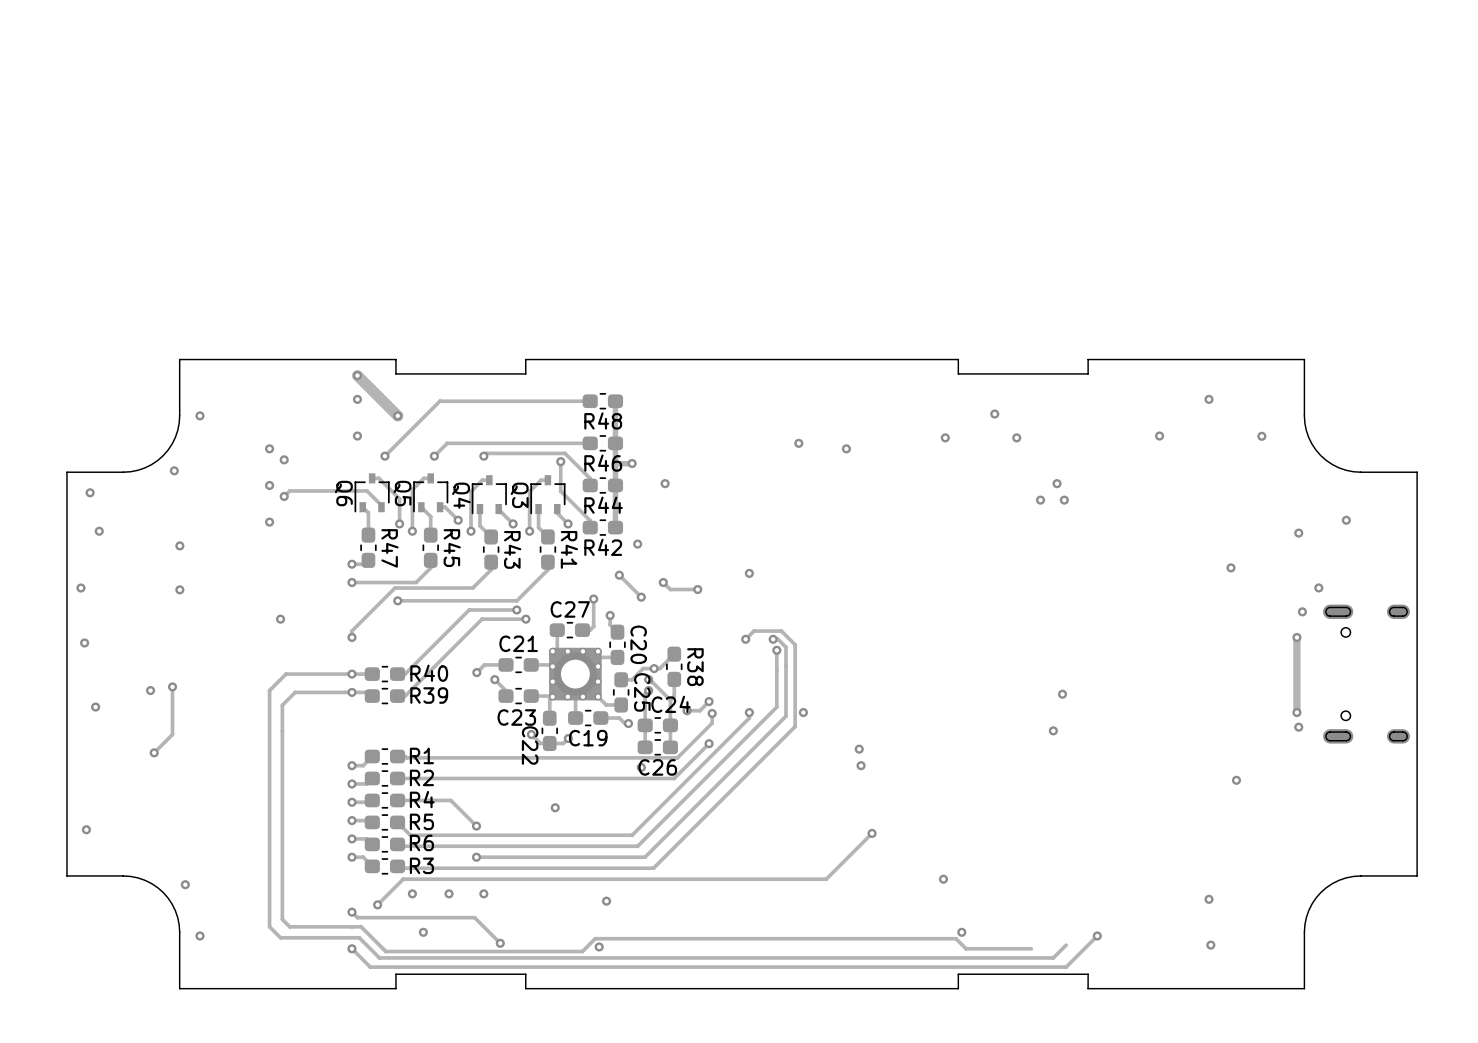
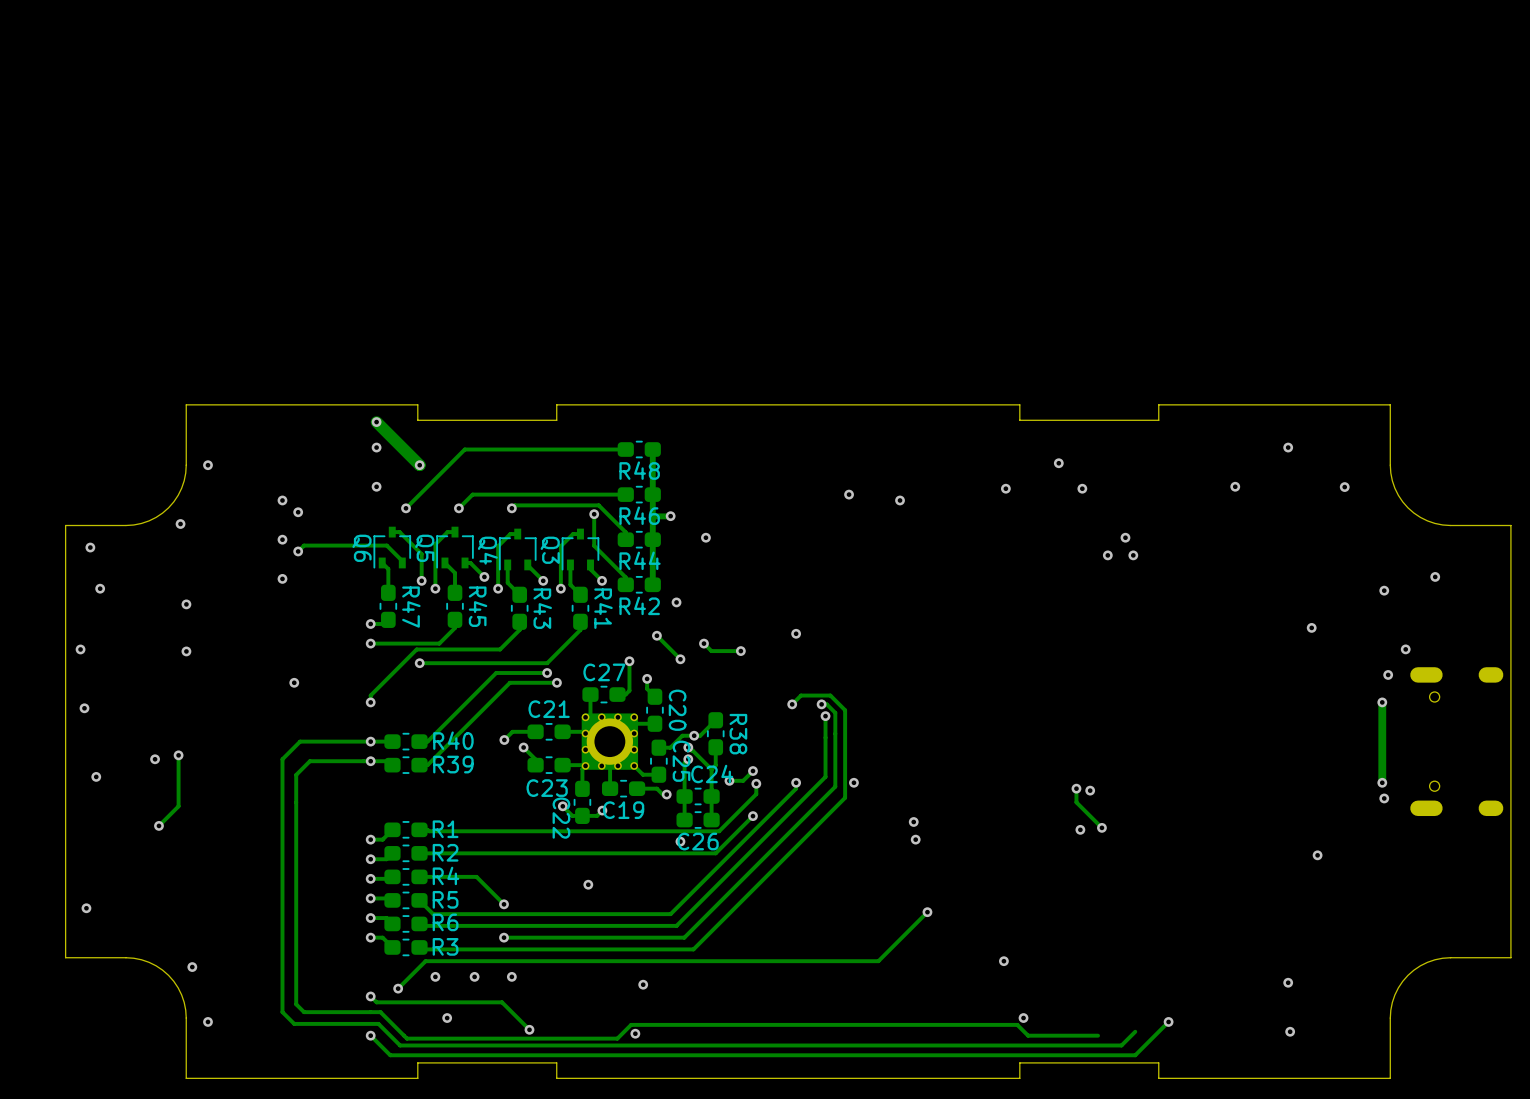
via: (1062, 694) -> none
track: none -> (1076, 788) (1076, 802) (1101, 827)
via: none -> (1076, 788)
via: none -> (1090, 790)
via: (1053, 730) -> none
via: none -> (1101, 827)
via: none -> (1080, 829)

